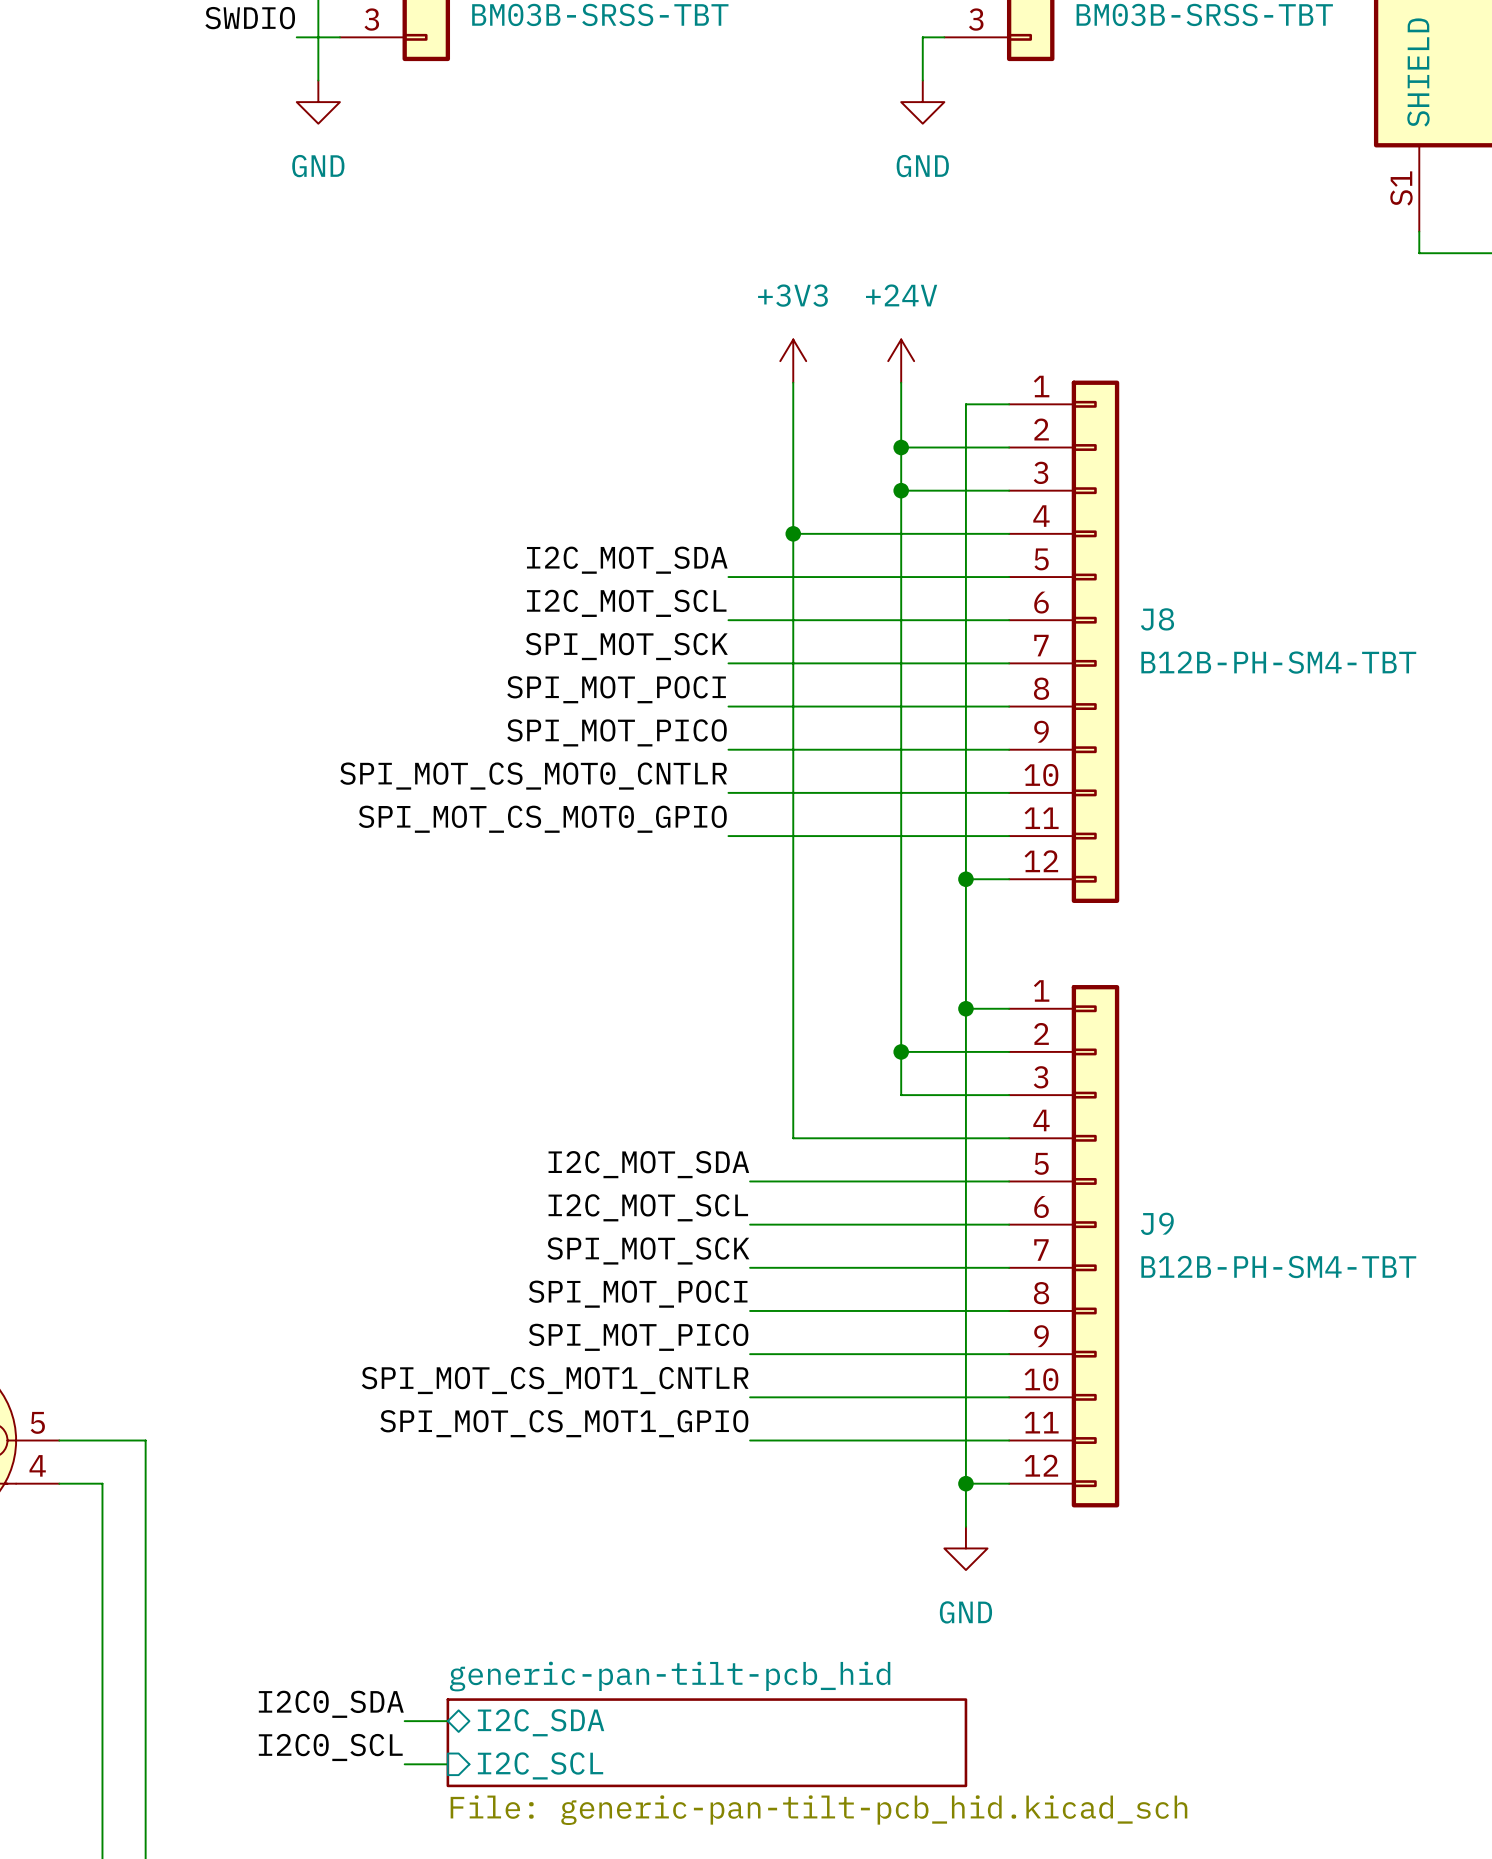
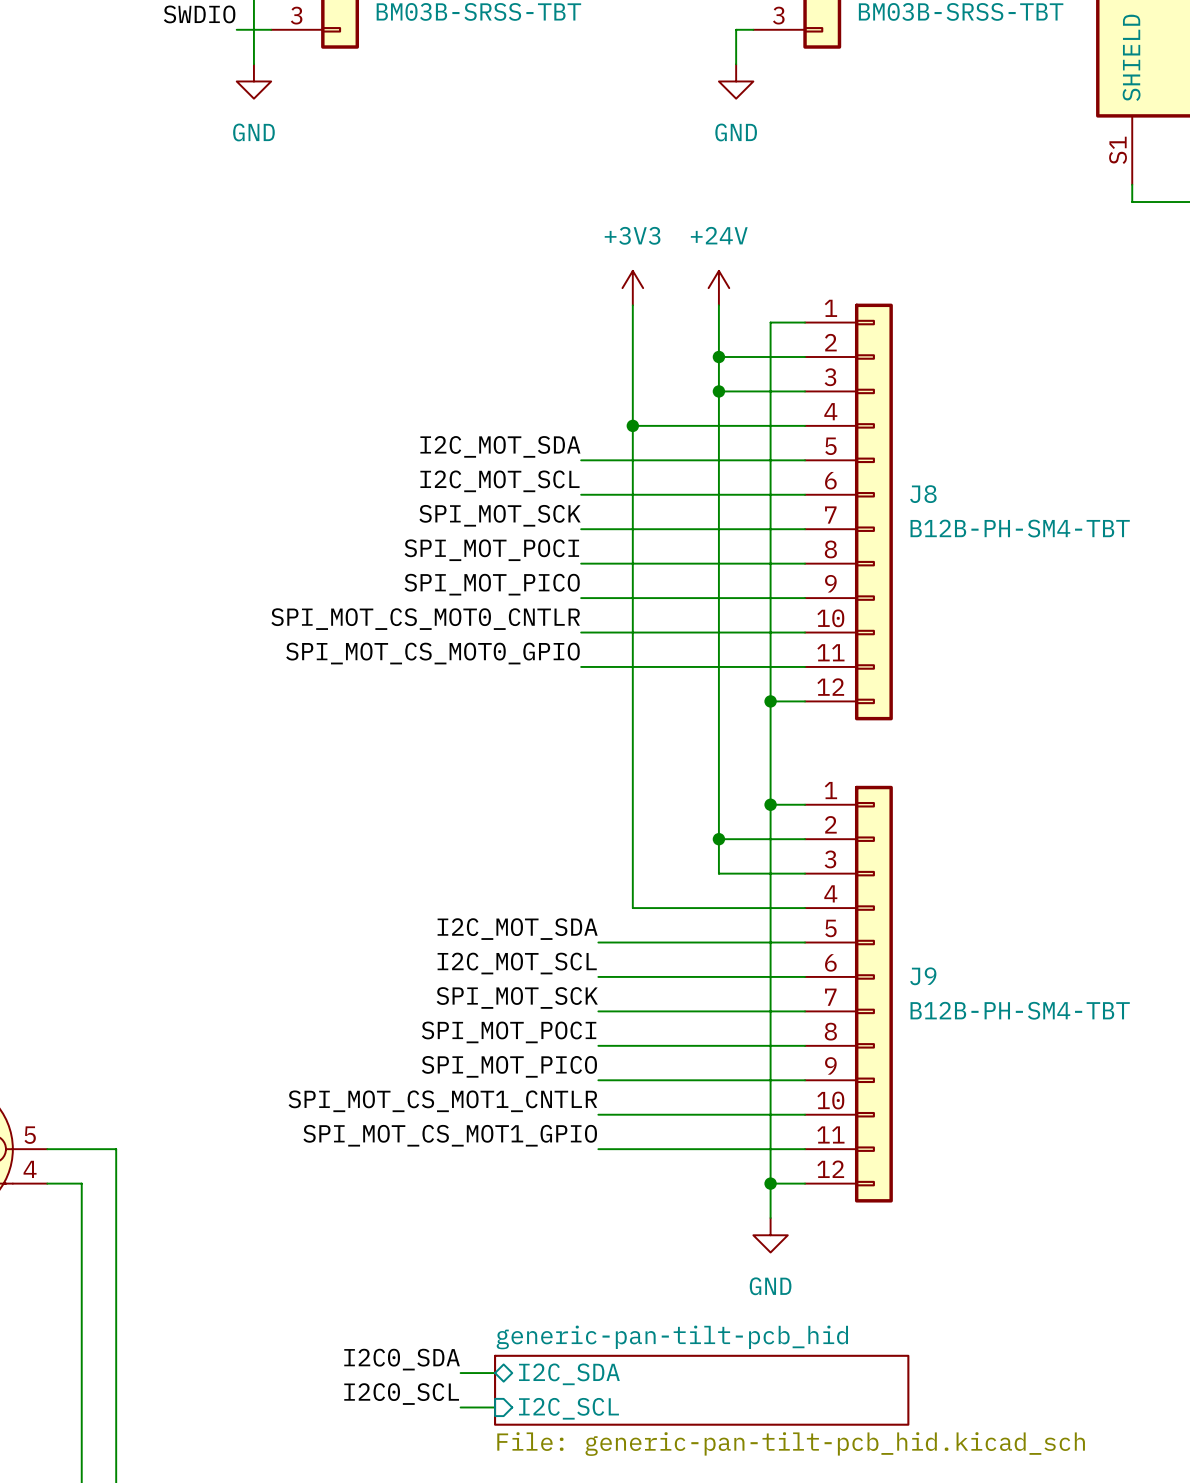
label position: I2C0_SDA (331, 1704) -> I2C0_SDA (402, 1359)
wire: (404, 1721) (447, 1721) -> (460, 1373) (495, 1373)
sheet pin position: I2C_SDA (541, 1722) -> I2C_SDA (569, 1374)
sheet generic-pan-tilt-pcb_hid position: (706, 1742) -> (701, 1390)
label position: I2C0_SCL (330, 1747) -> I2C0_SCL (401, 1394)
wire: (404, 1764) (447, 1764) -> (460, 1407) (495, 1407)
sheet pin position: I2C_SCL (540, 1765) -> I2C_SCL (568, 1408)

